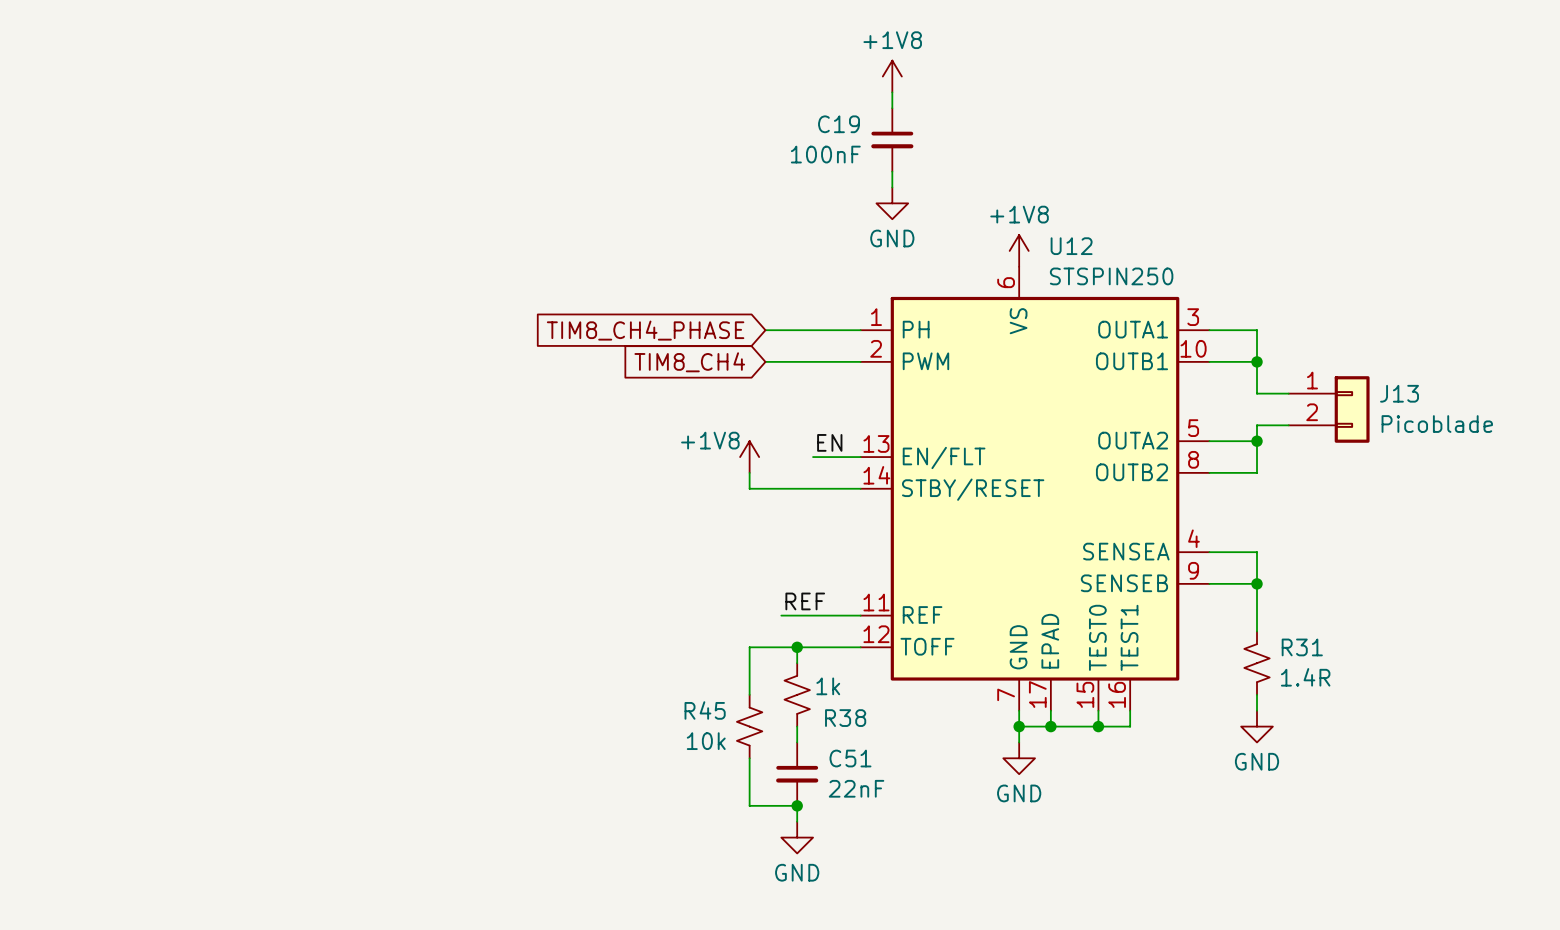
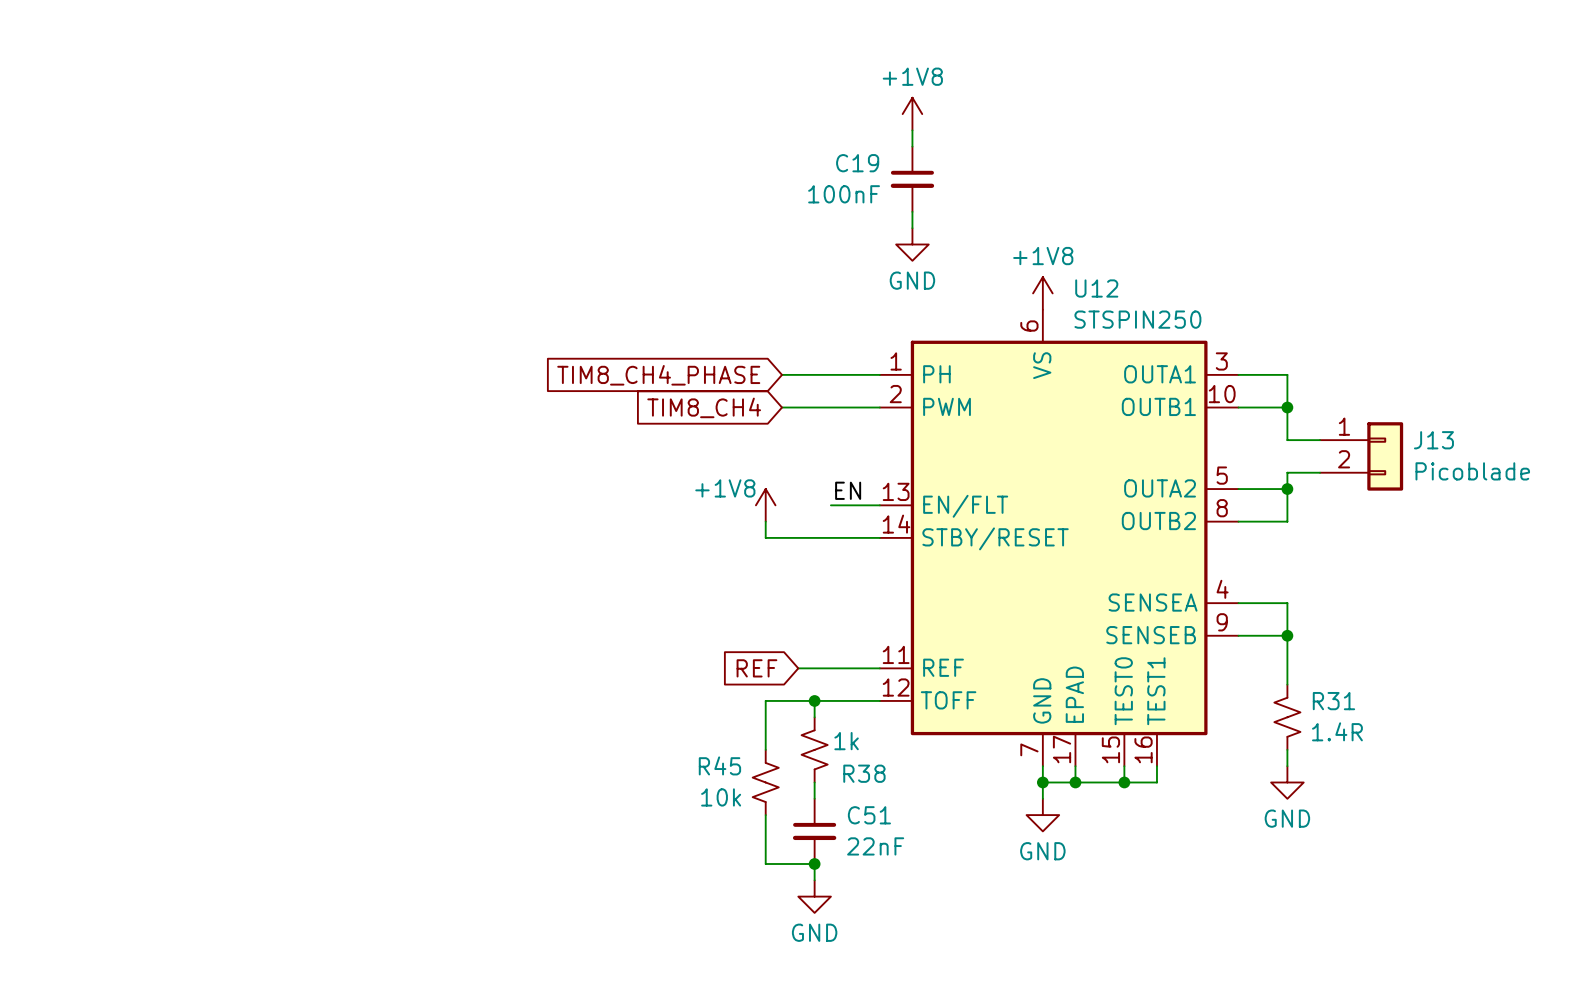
label: REF (805, 601) -> none
global label: none -> REF (756, 668)

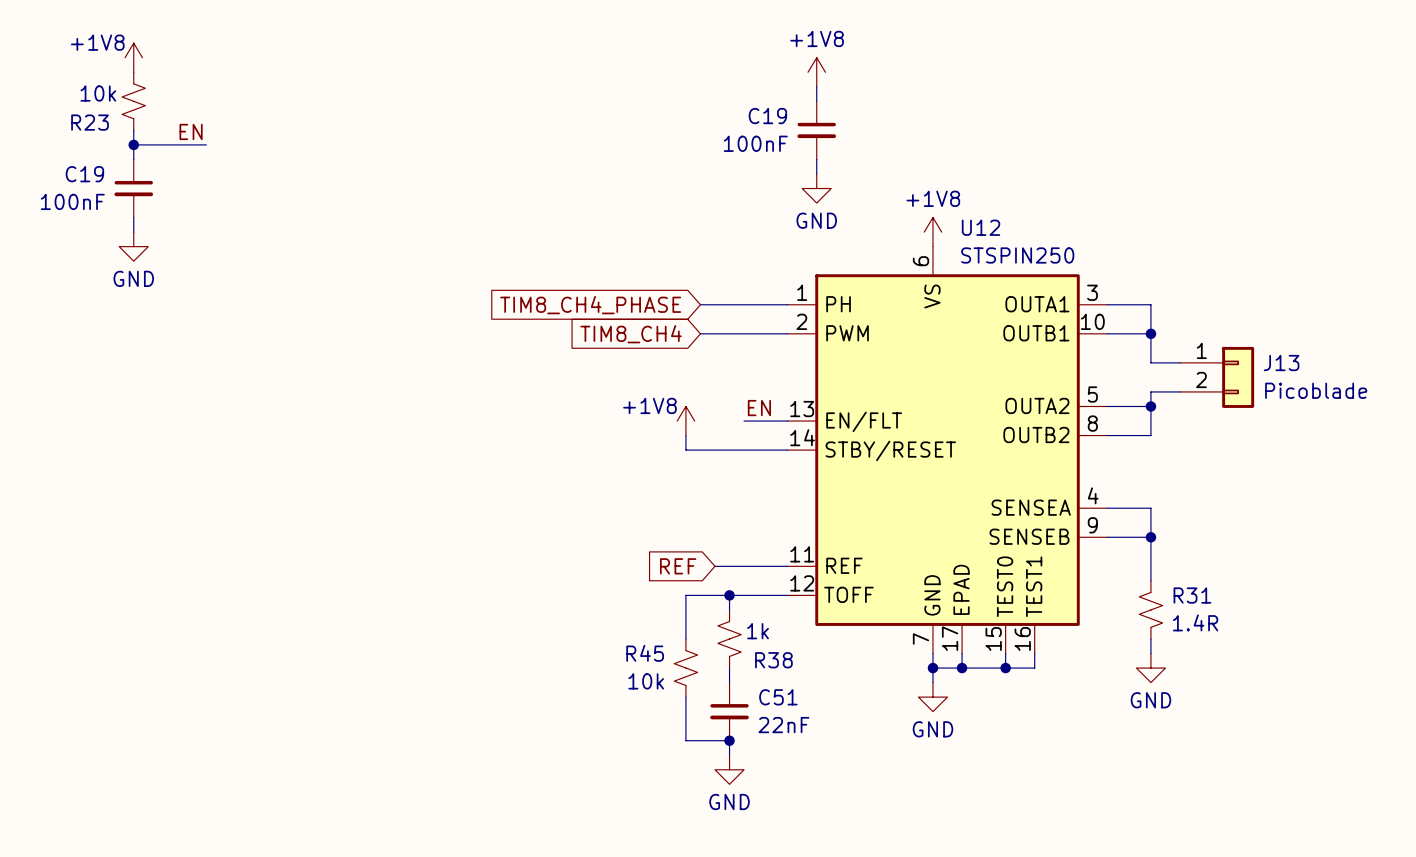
power symbol: none -> +1V8 (133, 57)
R23: none -> 10k (133, 101)
wire: none -> (133, 130) (133, 159)
label: none -> EN (191, 131)
wire: none -> (133, 144) (206, 144)
junction: none -> (133, 144)
C19: none -> 100nF (133, 188)
wire: none -> (133, 217) (133, 232)
power symbol: none -> GND (133, 246)

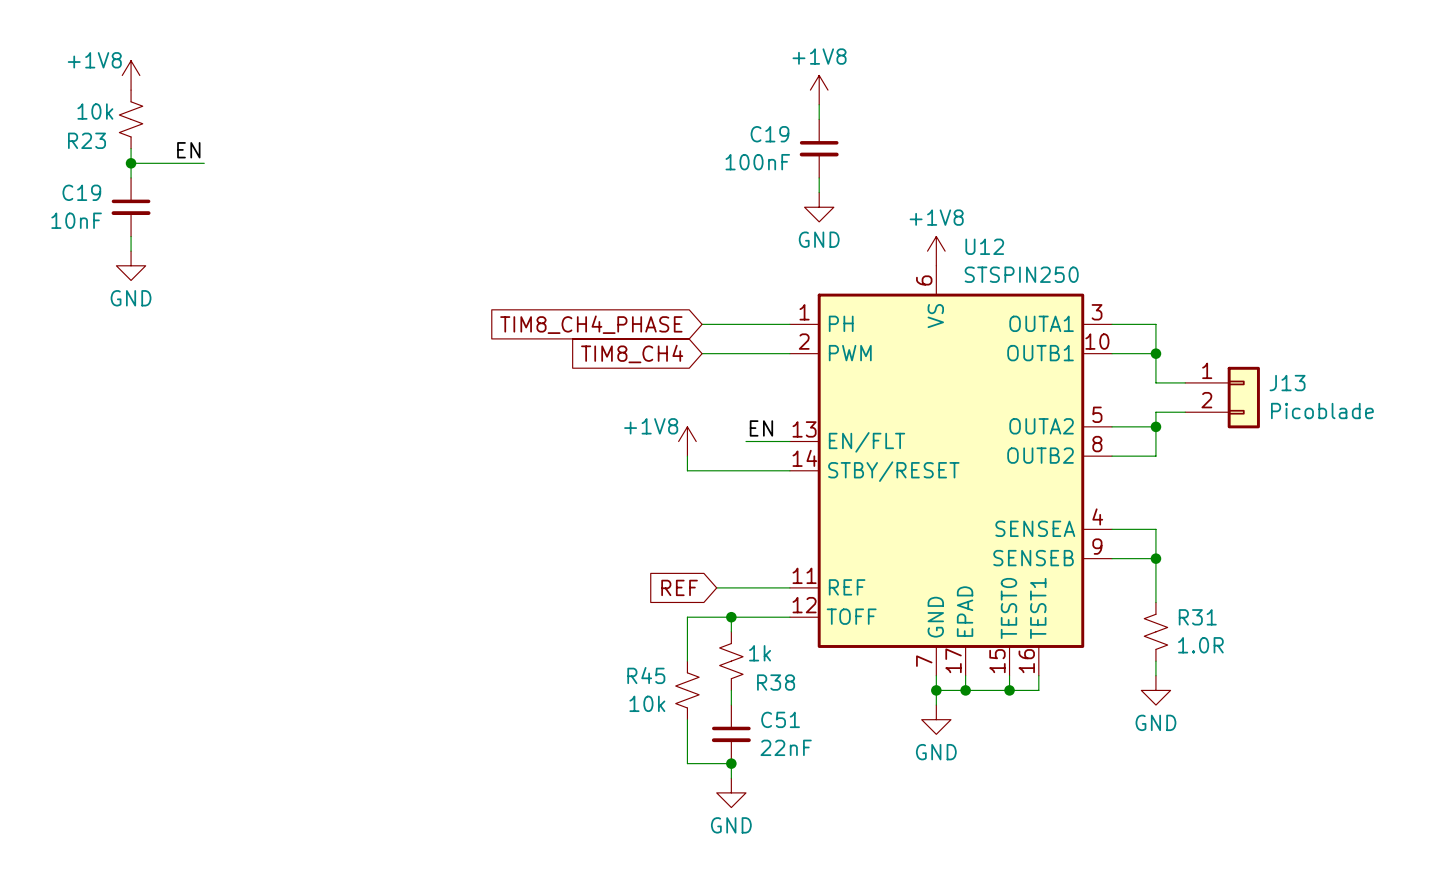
C19 value: 100nF (72, 201) -> 10nF (76, 220)
R31 value: 1.4R (1195, 622) -> 1.0R (1200, 645)

